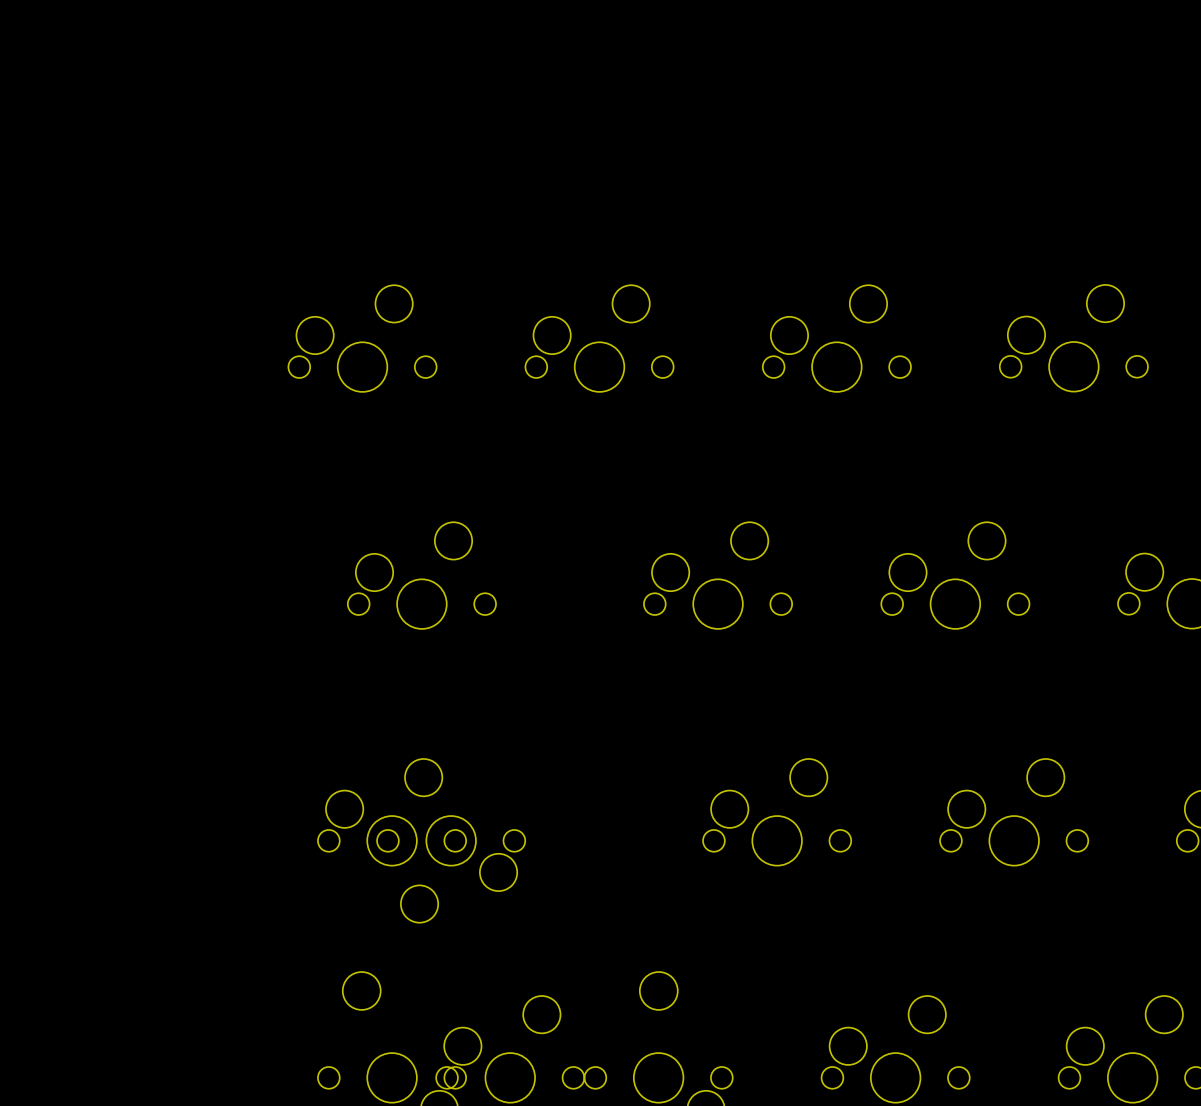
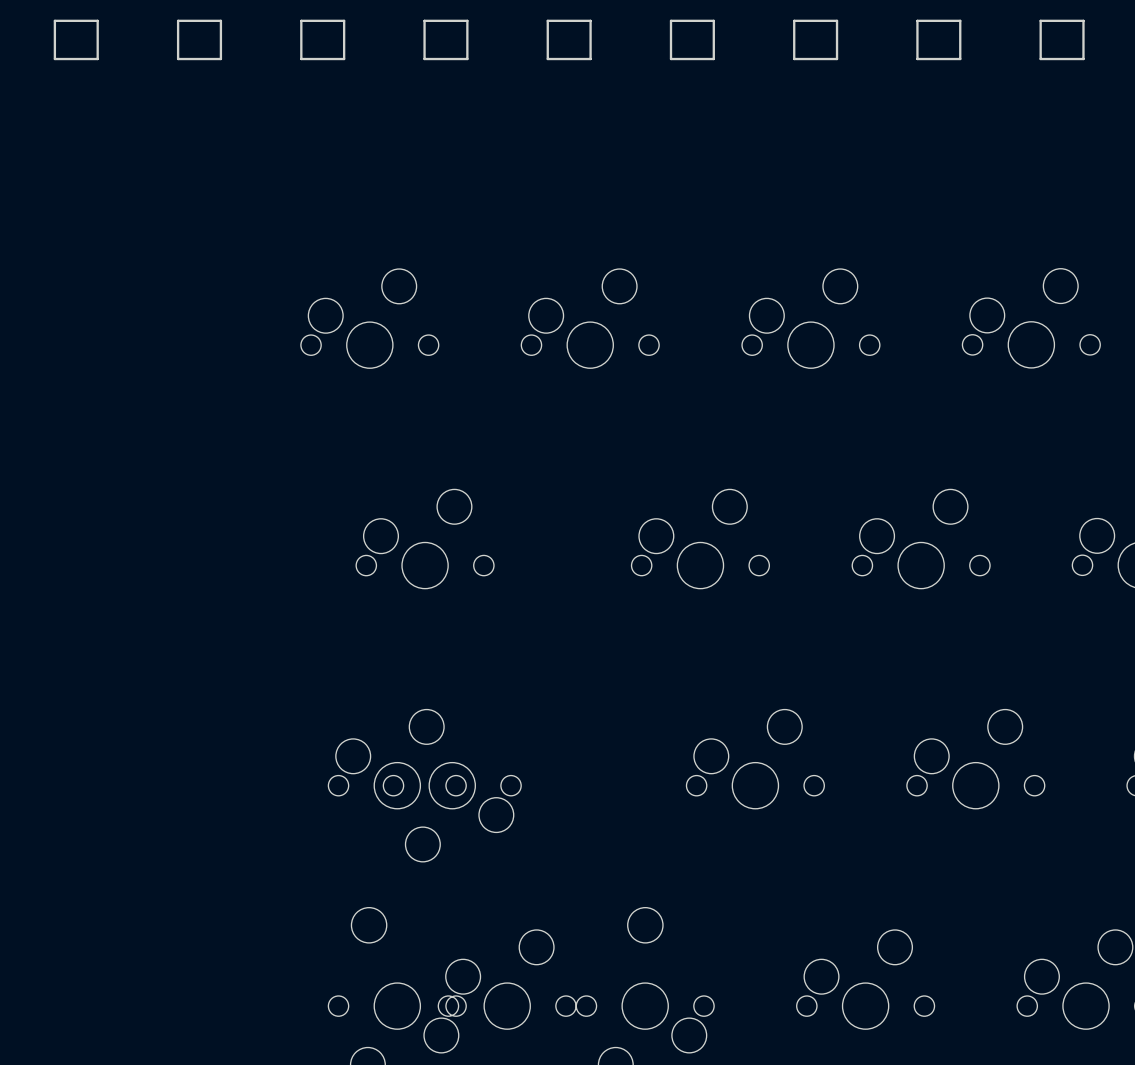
part: none -> (76, 39)
part: none -> (199, 39)
part: none -> (322, 39)
part: none -> (445, 39)
part: none -> (569, 39)
part: none -> (692, 39)
part: none -> (815, 39)
part: none -> (938, 39)
part: none -> (1062, 39)

